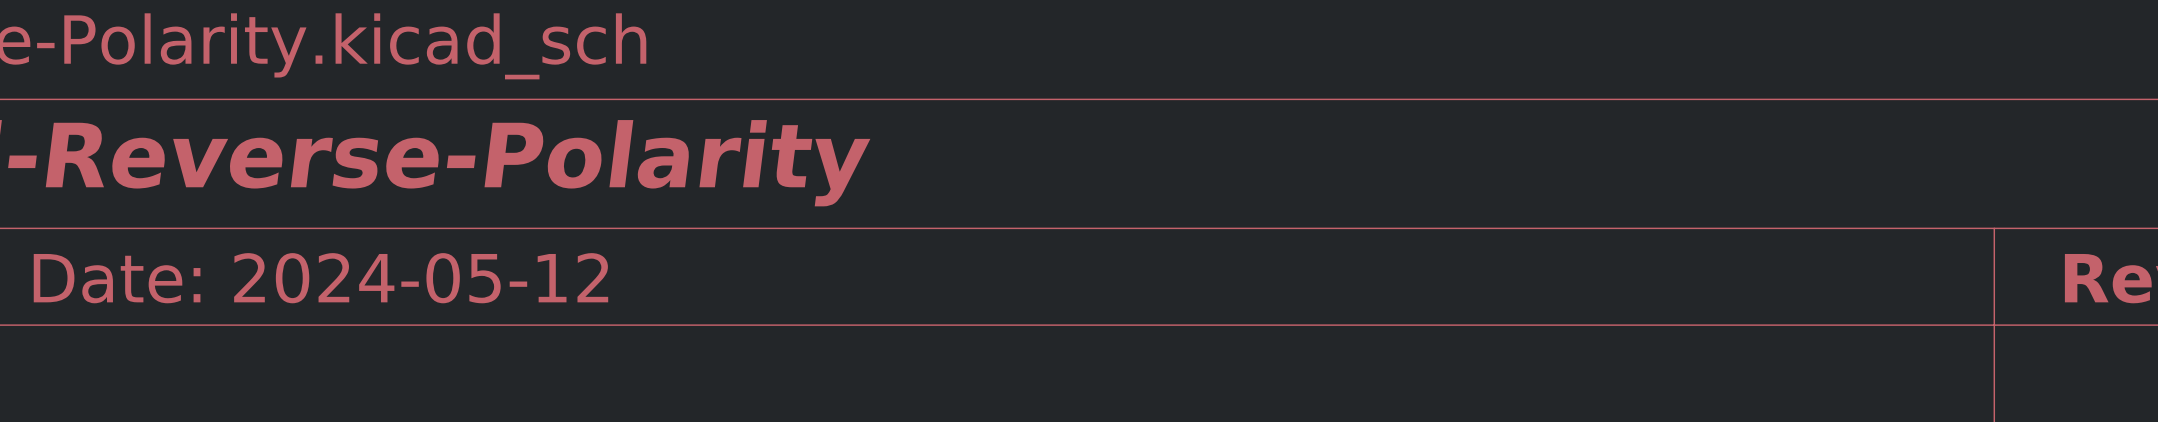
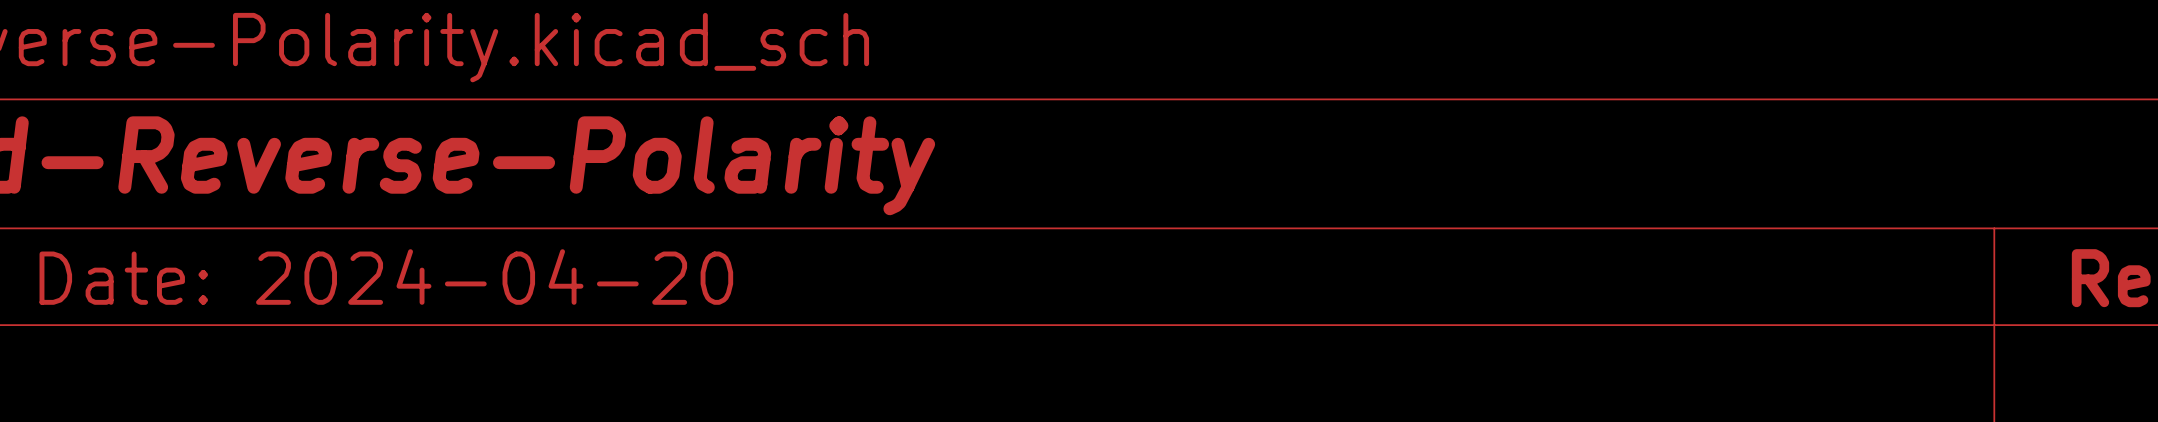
title block: Date: 2024-05-12 (320, 278) -> Date: 2024-04-20 (386, 277)

